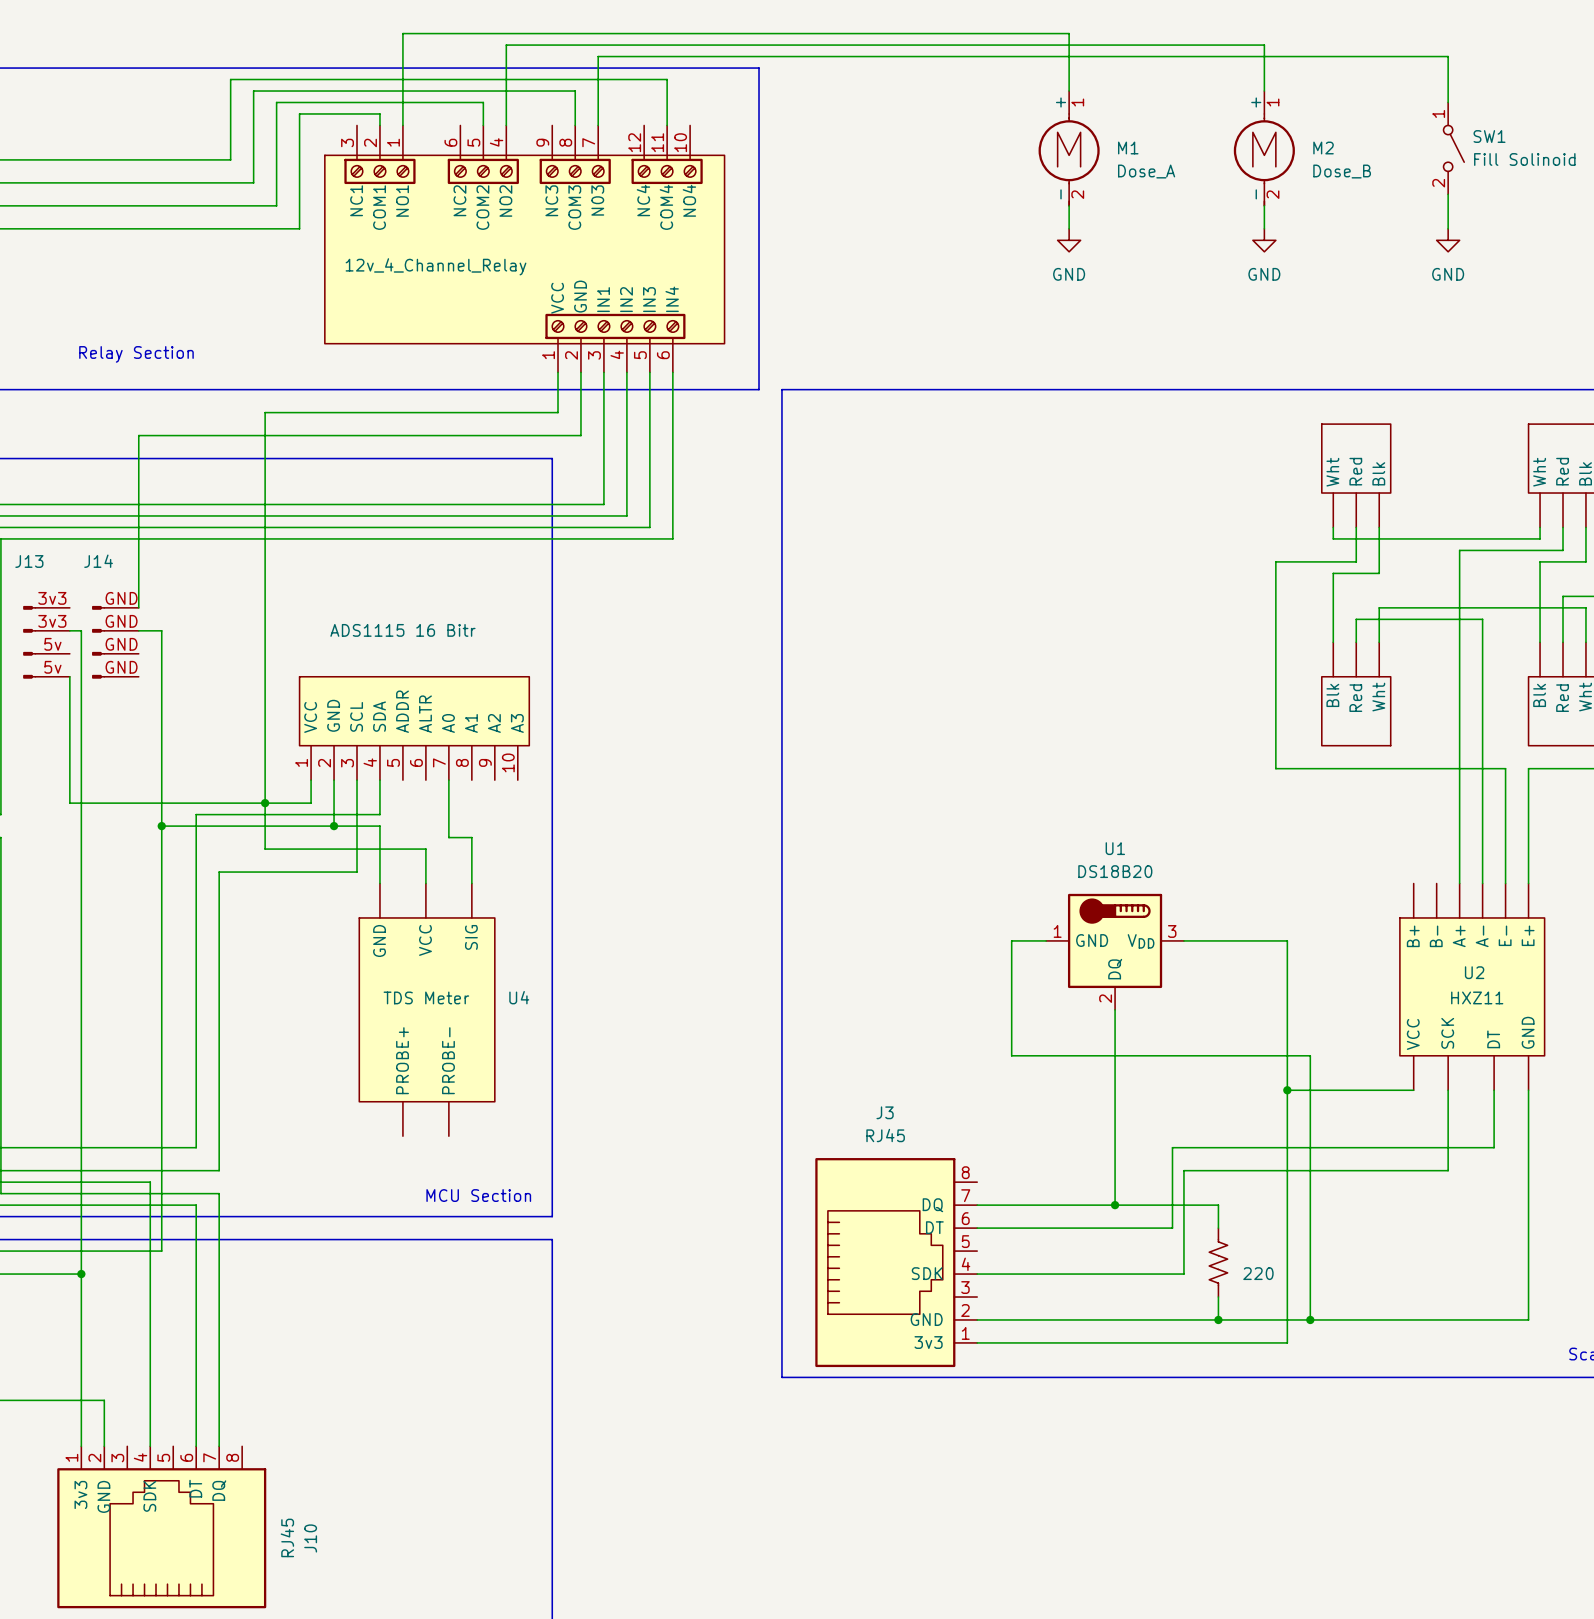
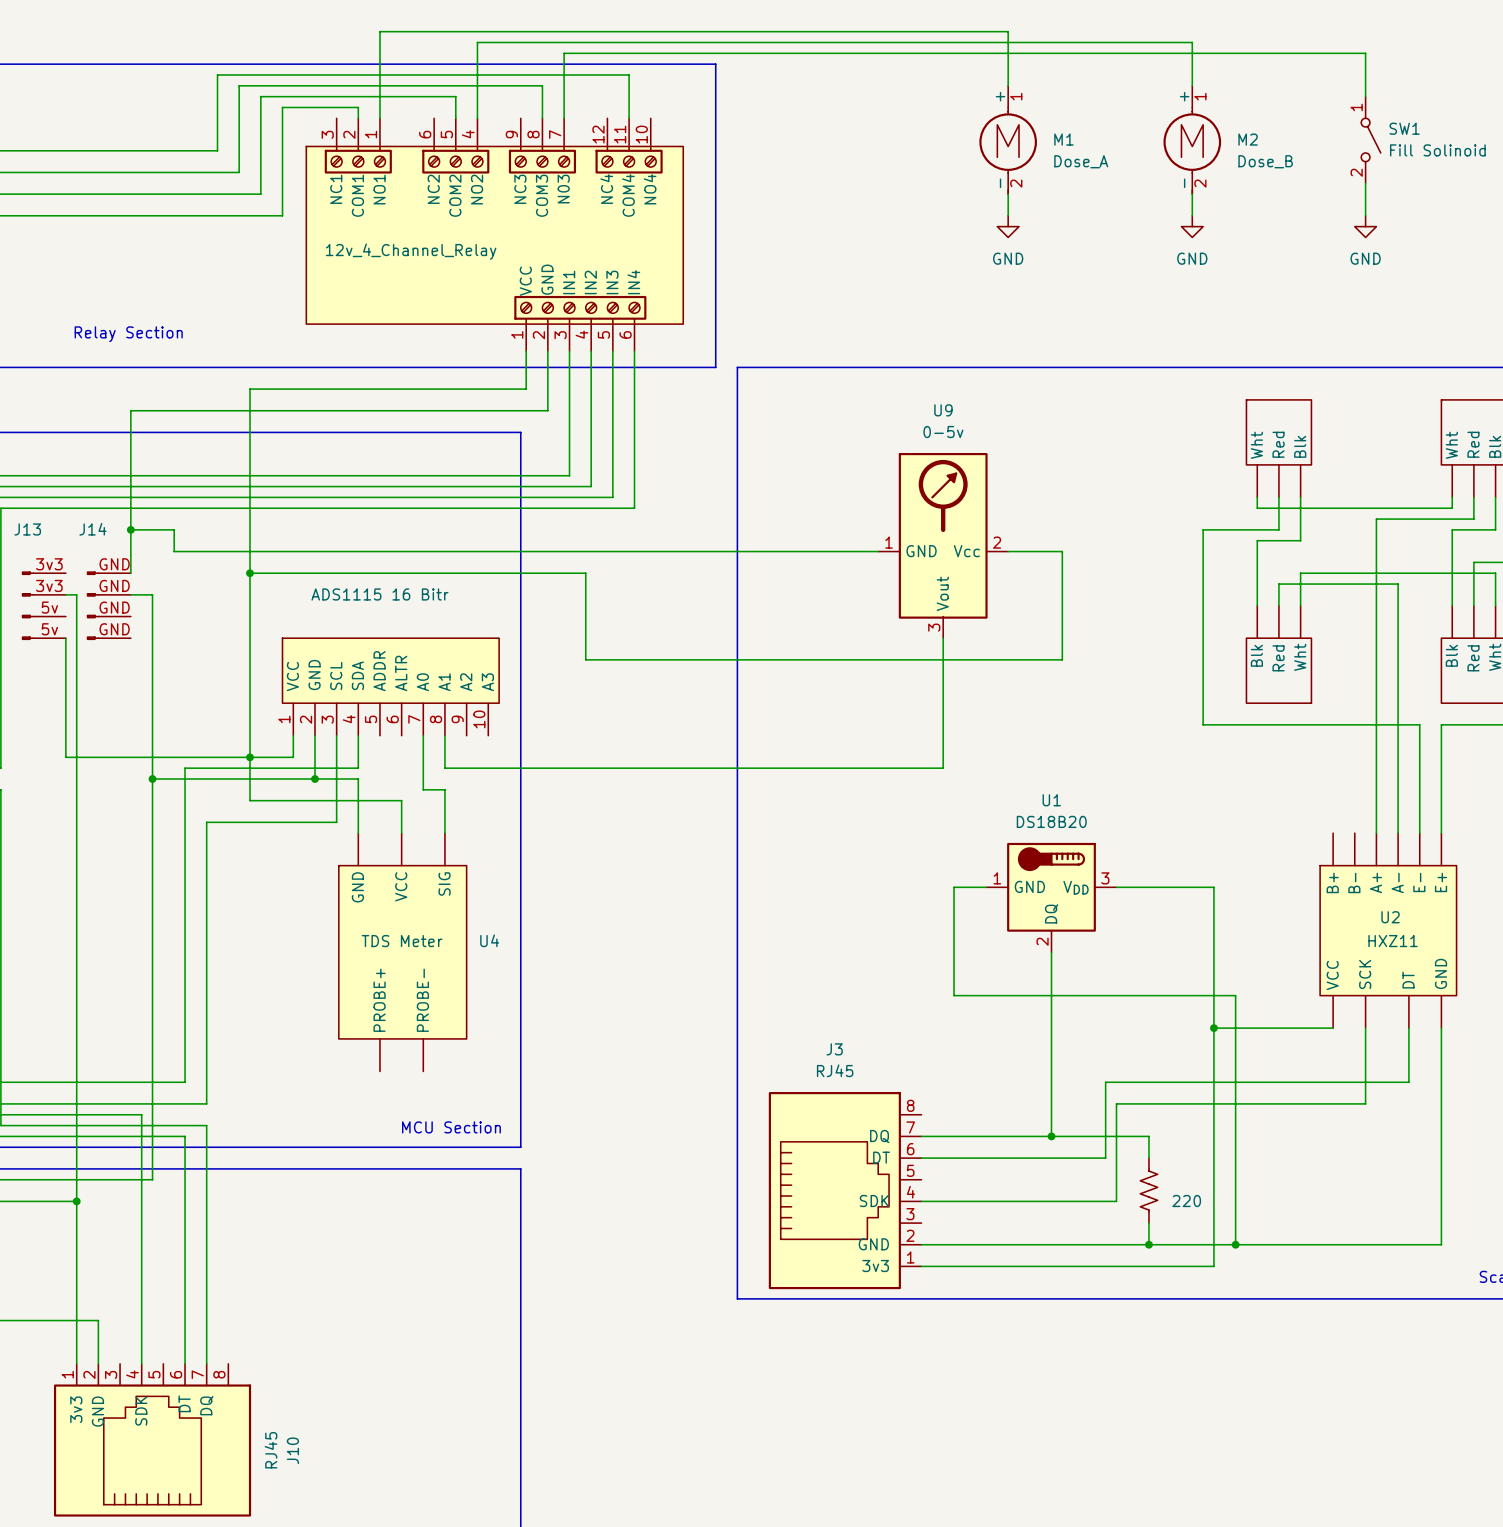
wire: none -> (130, 529) (174, 529) (174, 551) (878, 551)
junction: none -> (130, 529)
U9: none -> 0-5v (943, 545)
wire: none -> (1008, 551) (1062, 551) (1062, 659) (585, 659) (585, 573) (250, 573)
junction: none -> (250, 573)
wire: none -> (943, 638) (943, 768) (444, 768) (444, 735)

